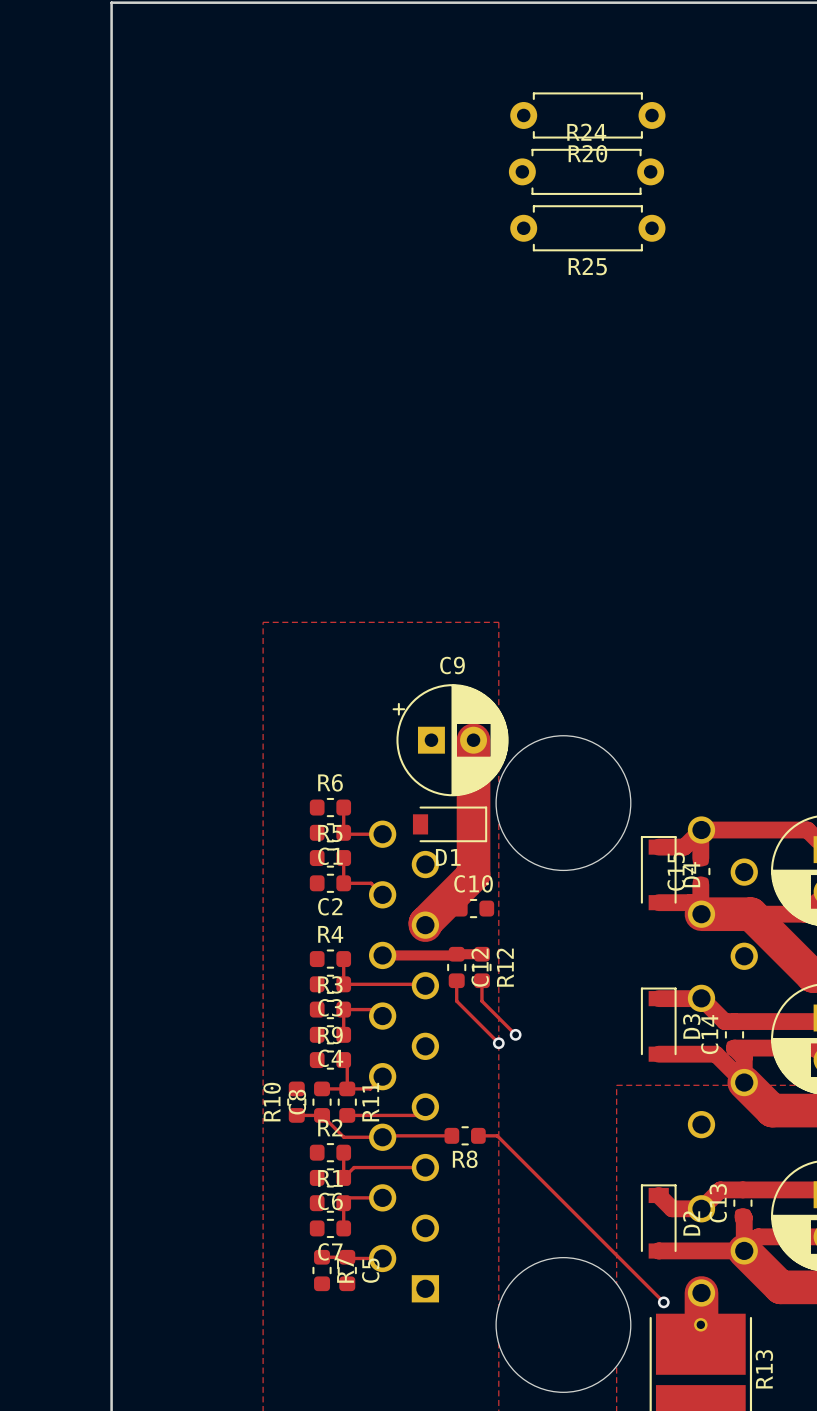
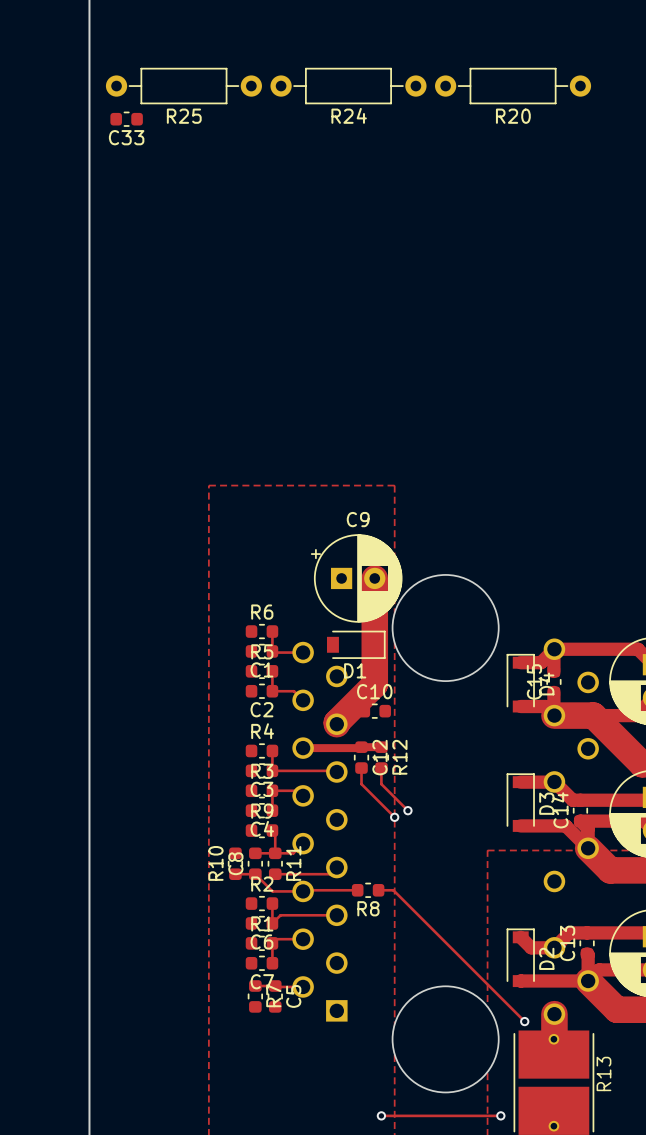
R20 footprint: [510, 92, 666, 139] -> [435, 67, 592, 105]
R24 name position: R24 (586, 132) -> R24 (349, 115)
R24 footprint: [508, 148, 665, 195] -> [270, 67, 427, 105]
C33: none -> (126, 119)
R25 footprint: [510, 205, 666, 252] -> [105, 67, 262, 105]

